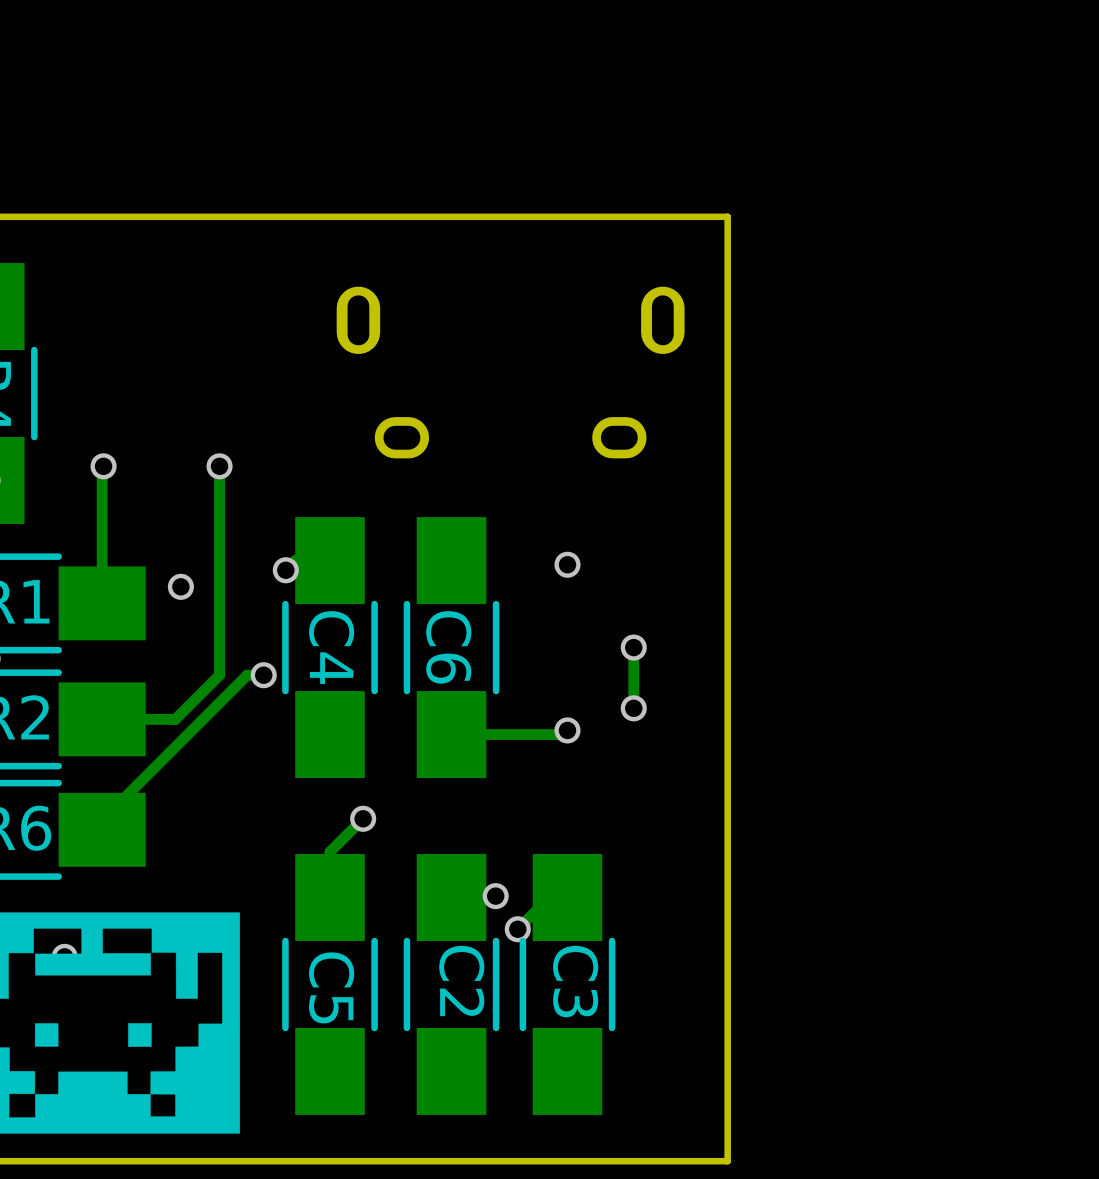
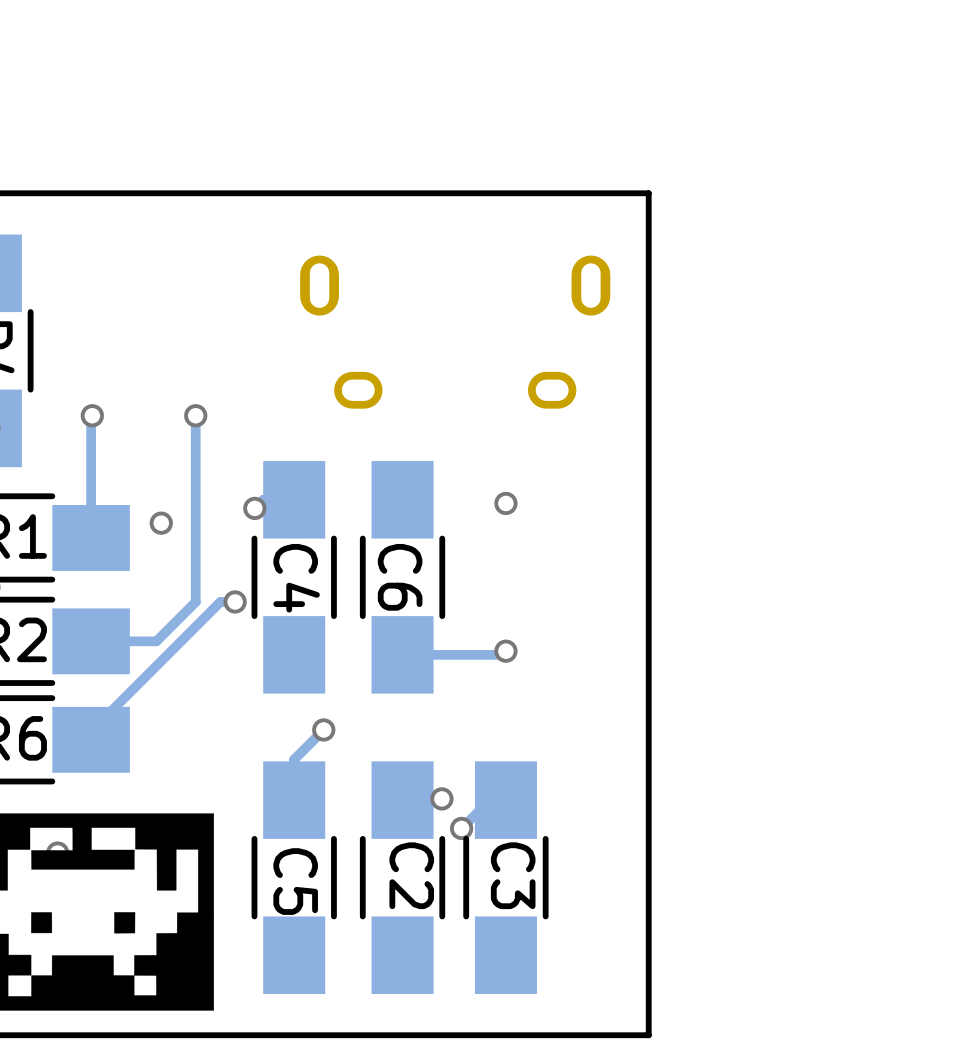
track: (633, 647) (633, 708) -> none
via: (633, 647) -> none
via: (633, 708) -> none

